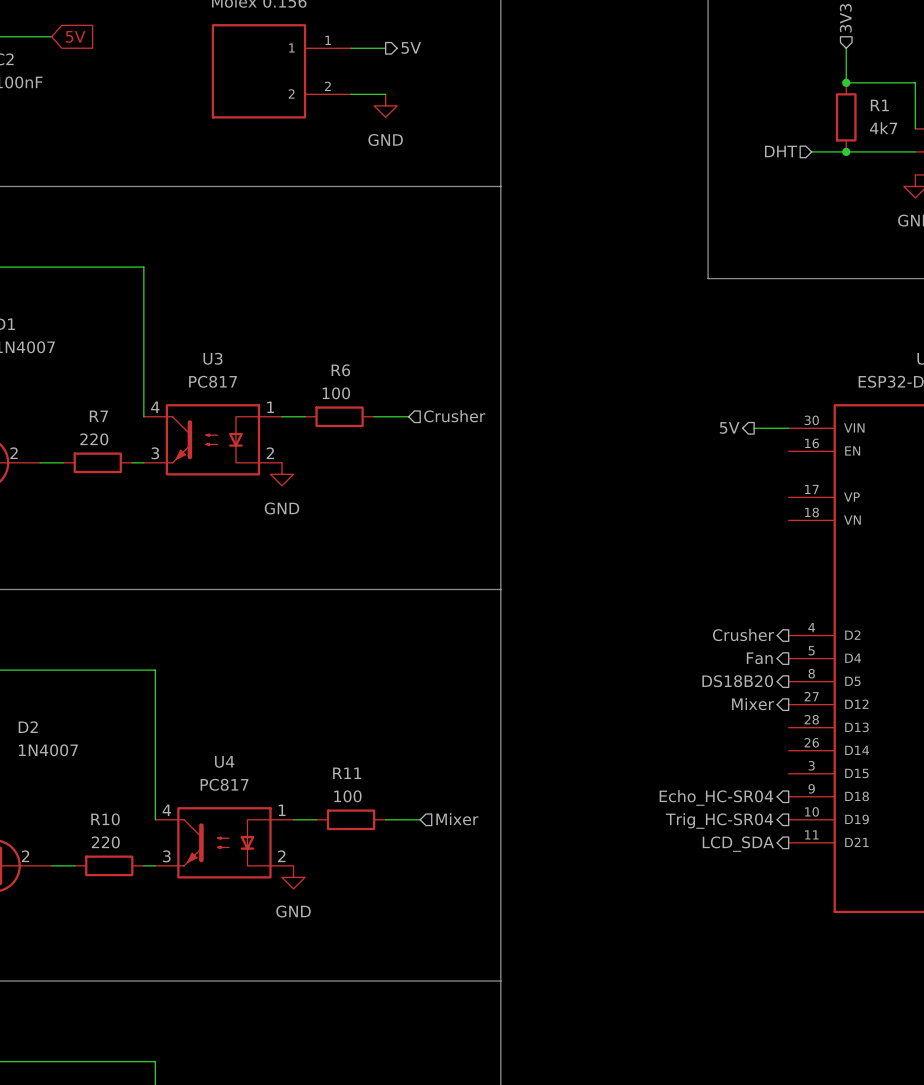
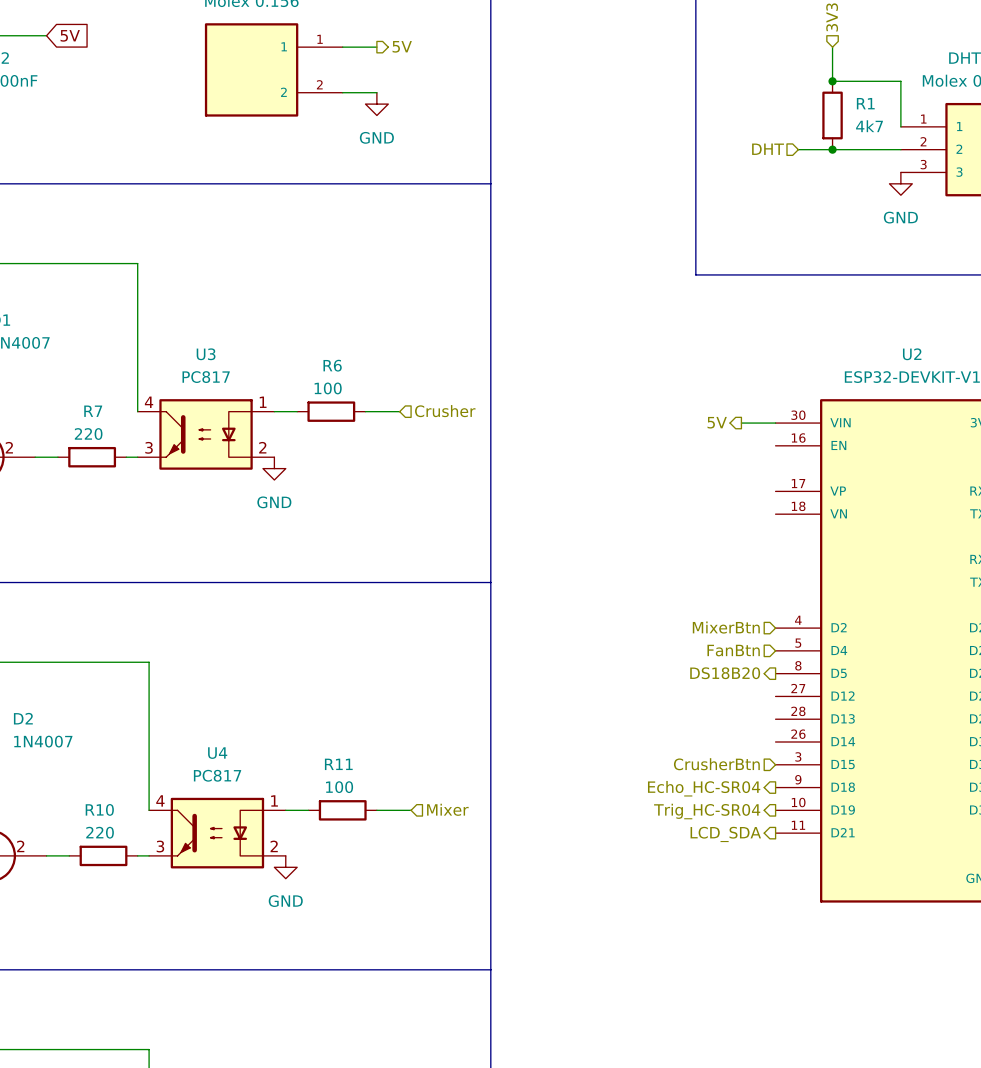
hierarchical label shape: output (743, 634) -> input (726, 627)
hierarchical label: Crusher (743, 634) -> MixerBtn (726, 627)
hierarchical label shape: output (759, 658) -> input (733, 650)
hierarchical label: Fan (759, 658) -> FanBtn (733, 650)
hierarchical label: Mixer (753, 704) -> none
hierarchical label: none -> CrusherBtn (716, 764)

